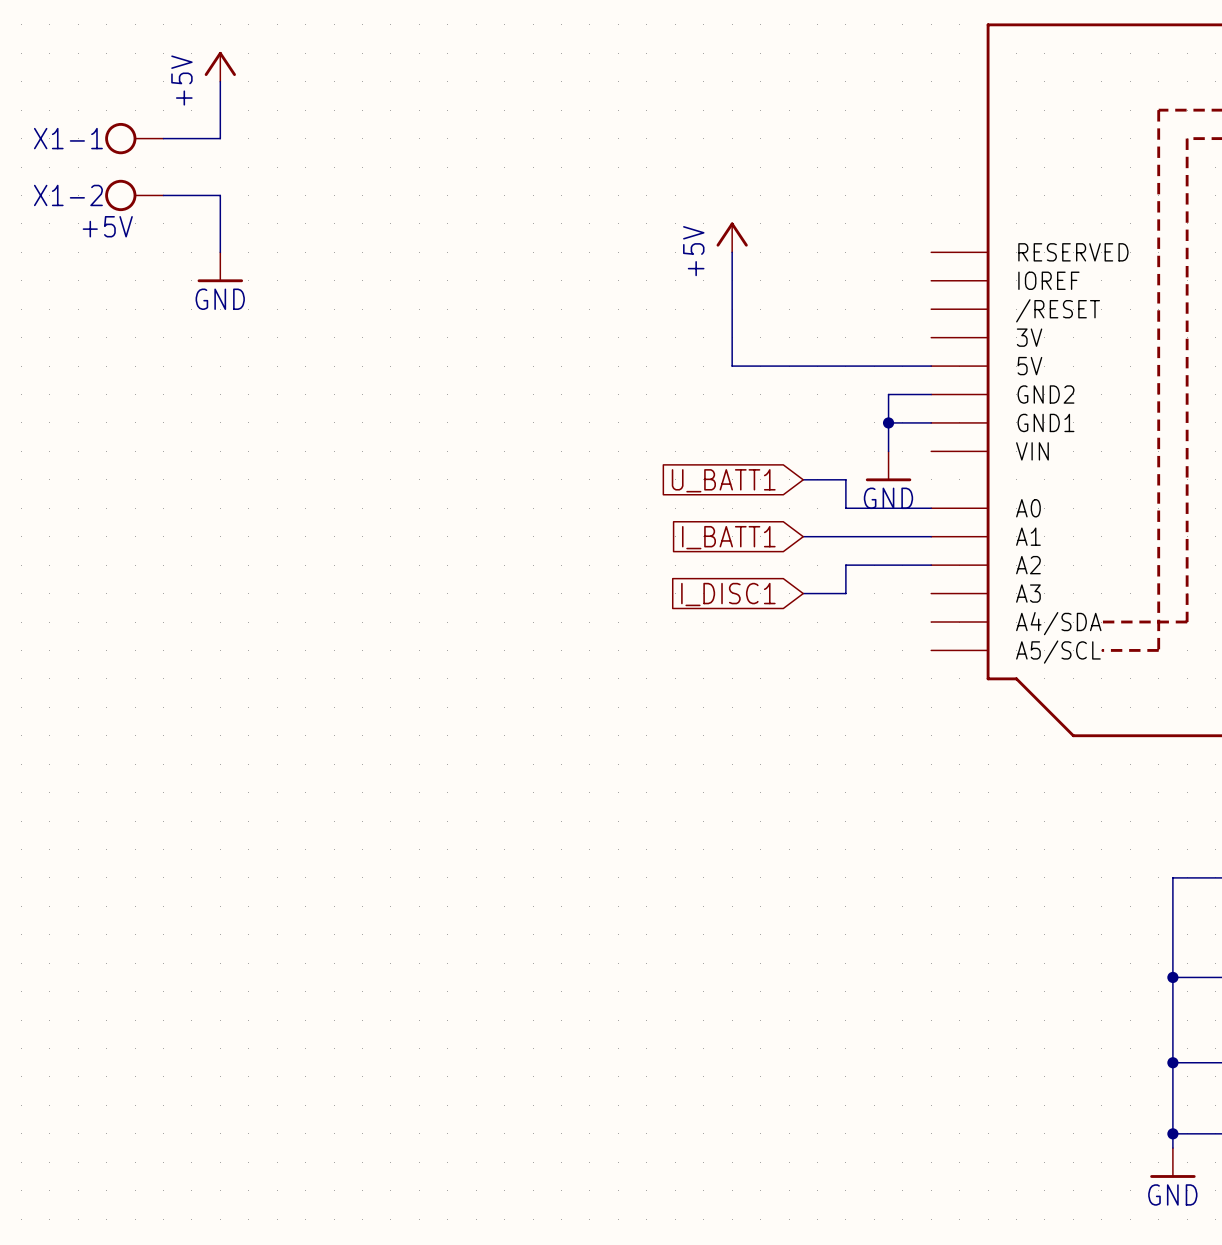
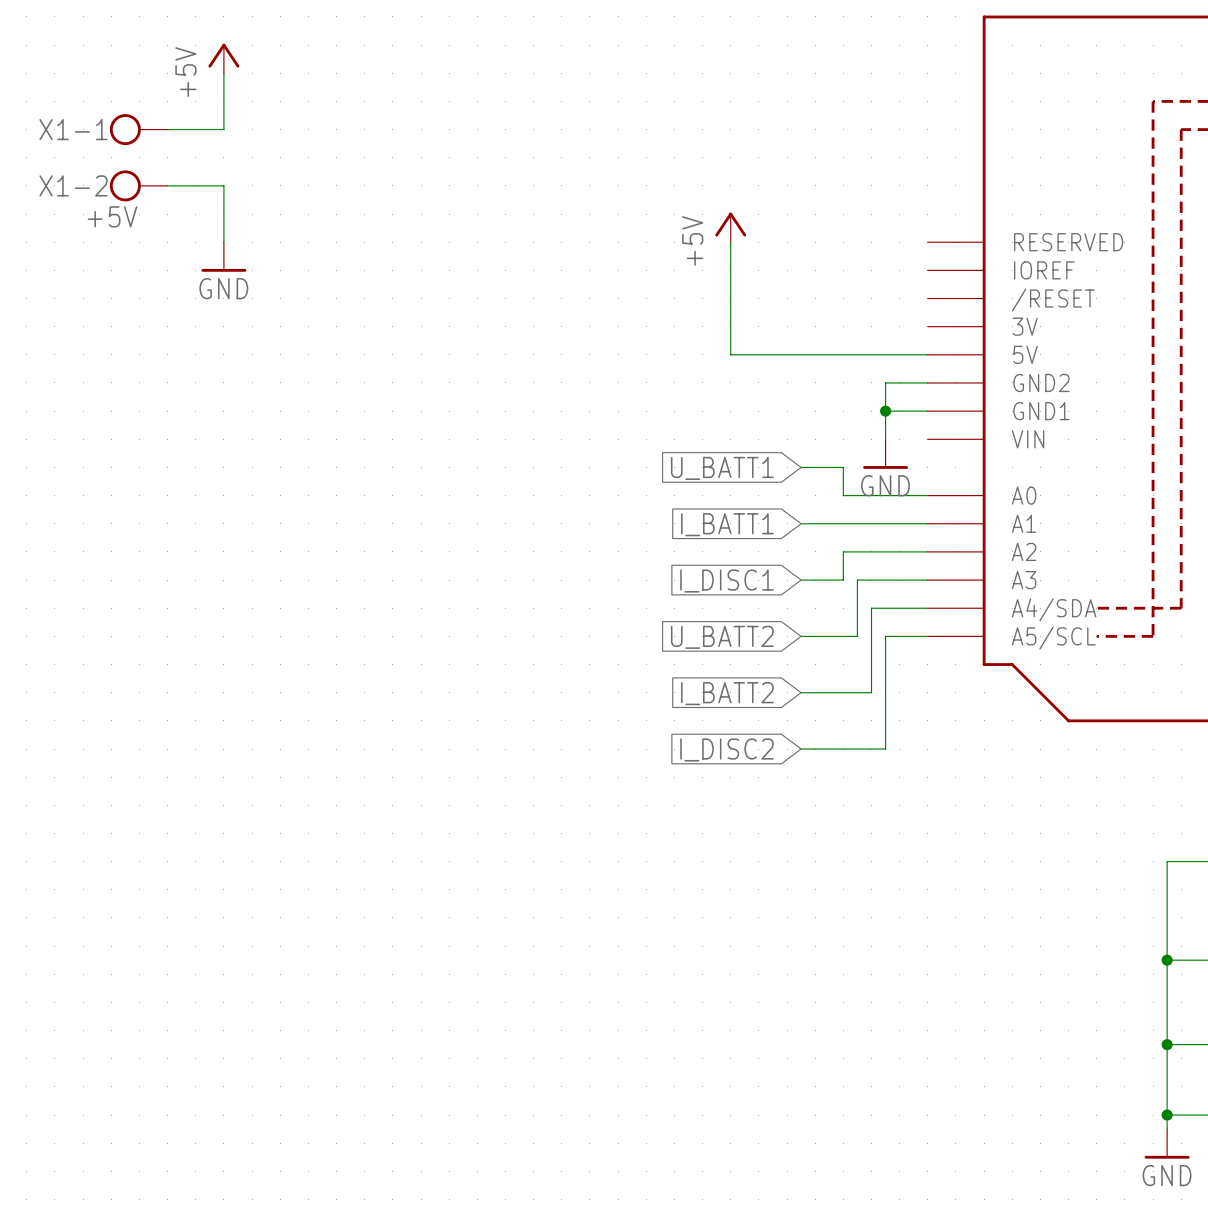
wire: none -> (927, 580) (857, 580) (857, 636) (801, 636)
wire: none -> (927, 608) (871, 608) (871, 692) (801, 692)
wire: none -> (927, 636) (885, 636) (885, 749) (801, 749)
global label: none -> U_BATT2 (722, 637)
global label: none -> I_BATT2 (727, 693)
global label: none -> I_DISC2 (727, 749)

